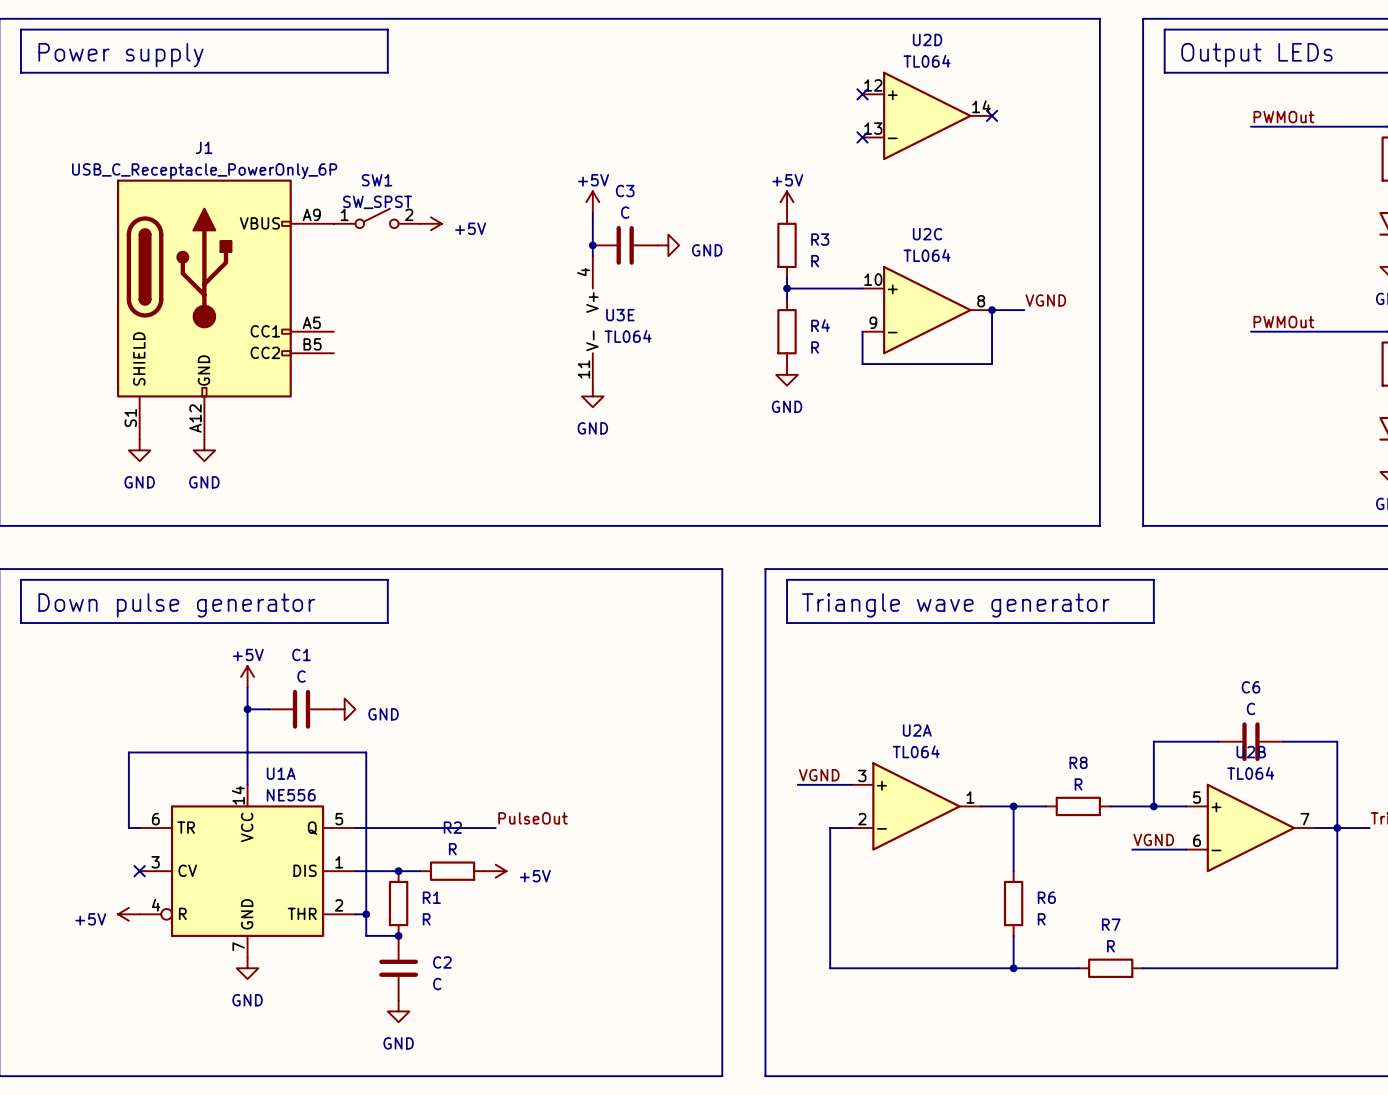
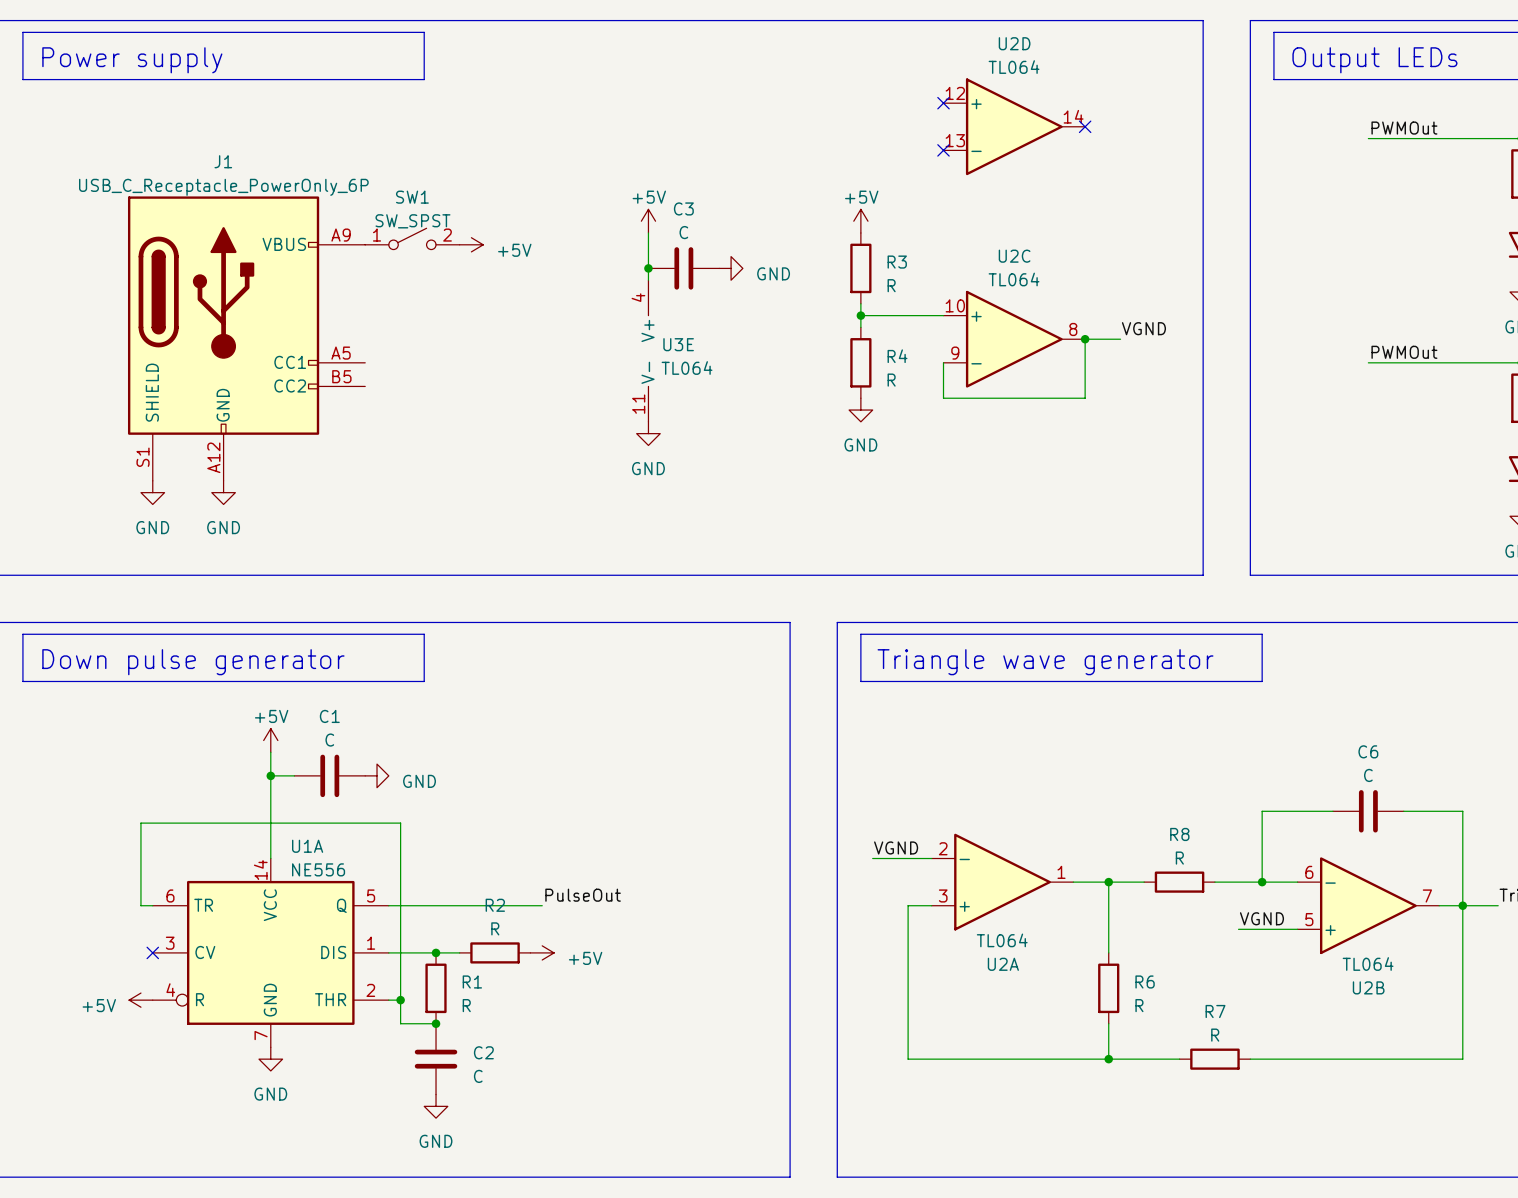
U2A flip: as is (916, 806) -> up-down (1002, 882)
U2B flip: as is (1250, 828) -> up-down (1368, 905)

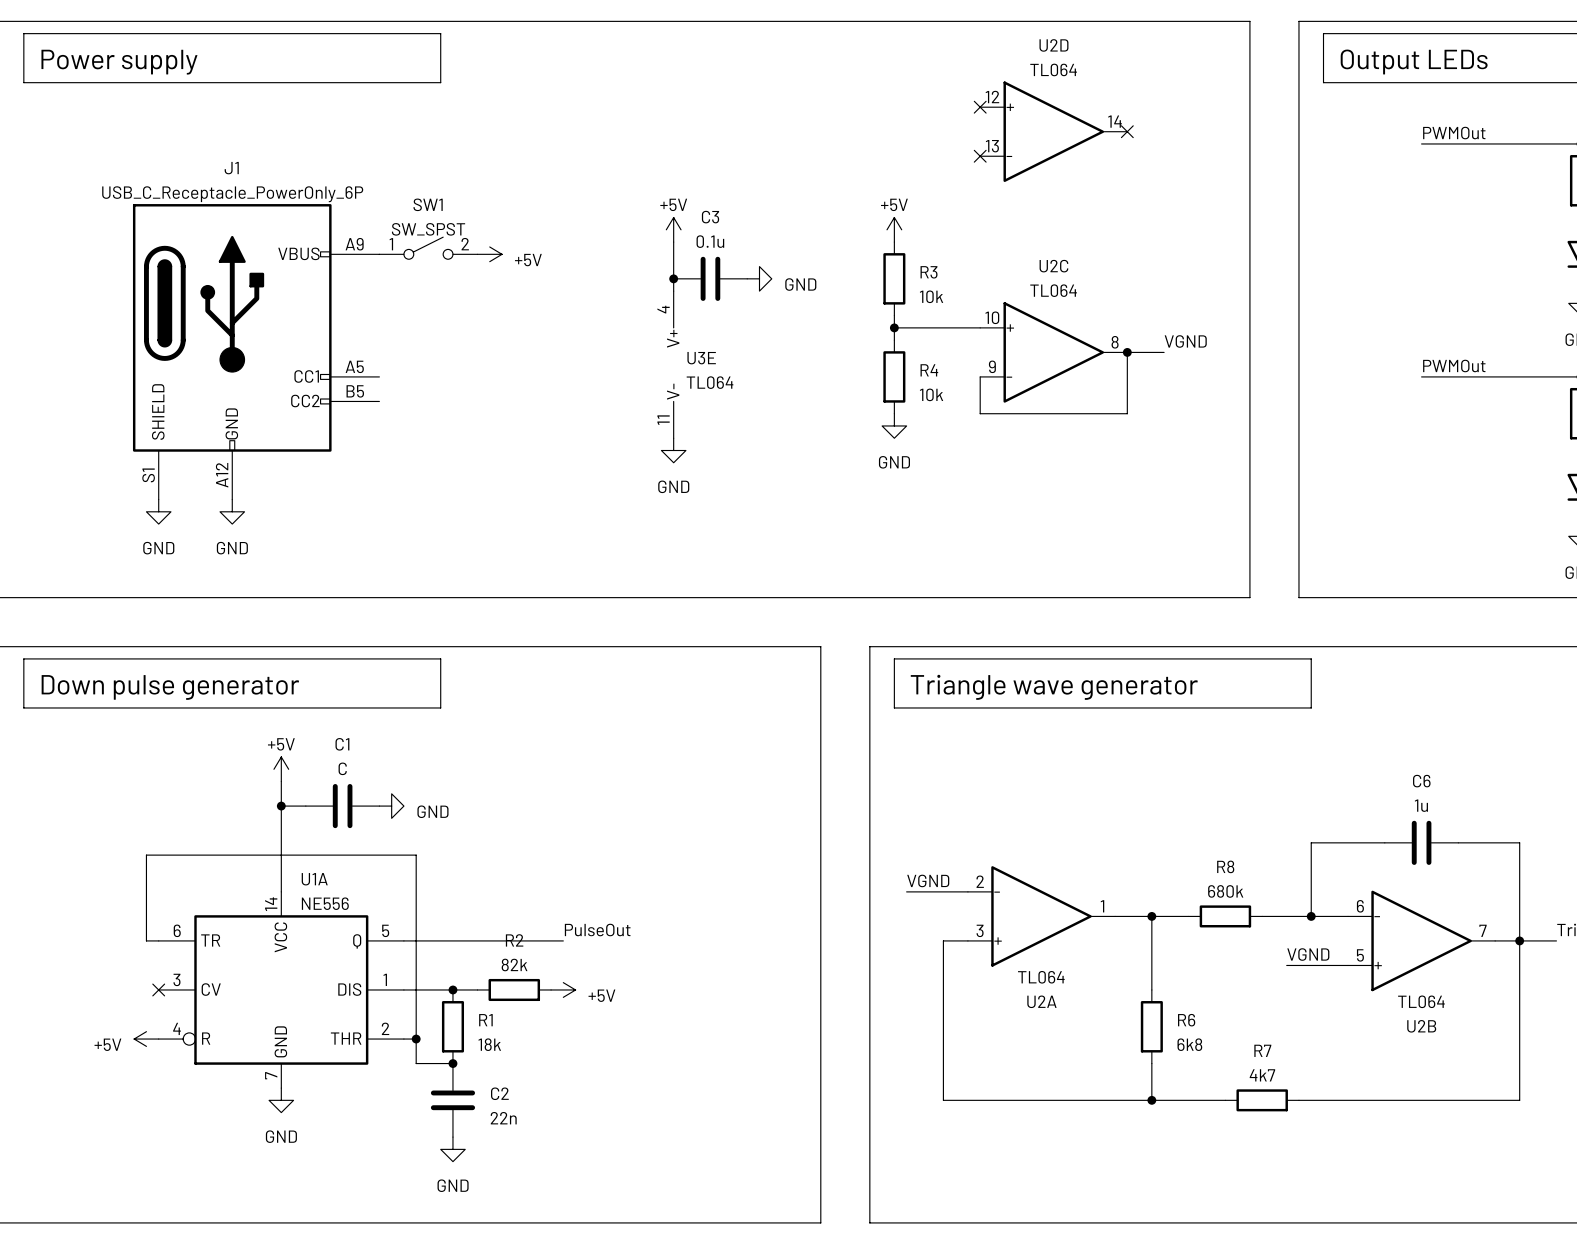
C3 value: C (683, 232) -> 0.1u (710, 241)
R3 value: R (891, 285) -> 10k (931, 296)
R4 value: R (891, 380) -> 10k (931, 394)
C6 value: C (1368, 775) -> 1u (1421, 805)
R8 value: R (1179, 858) -> 680k (1225, 891)
R2 value: R (495, 928) -> 82k (514, 964)
R1 value: R (466, 1005) -> 18k (489, 1044)
R6 value: R (1139, 1005) -> 6k8 (1189, 1044)
R7 value: R (1215, 1035) -> 4k7 (1262, 1075)
C2 value: C (478, 1076) -> 22n (503, 1118)

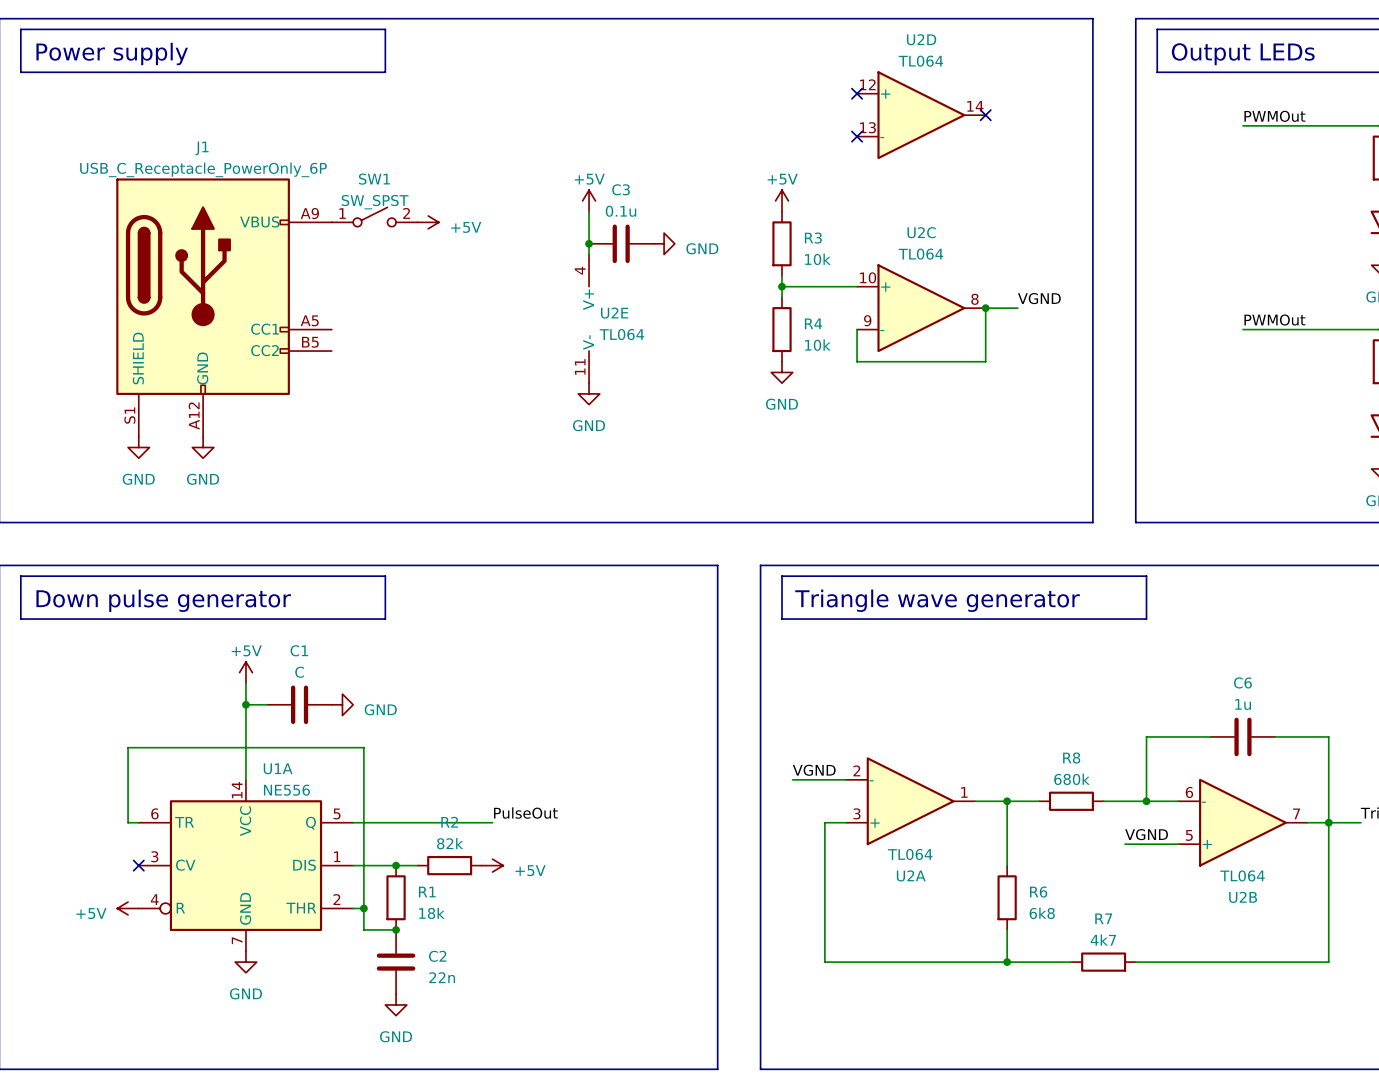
U3E name: U3E (701, 358) -> U2E (614, 313)

